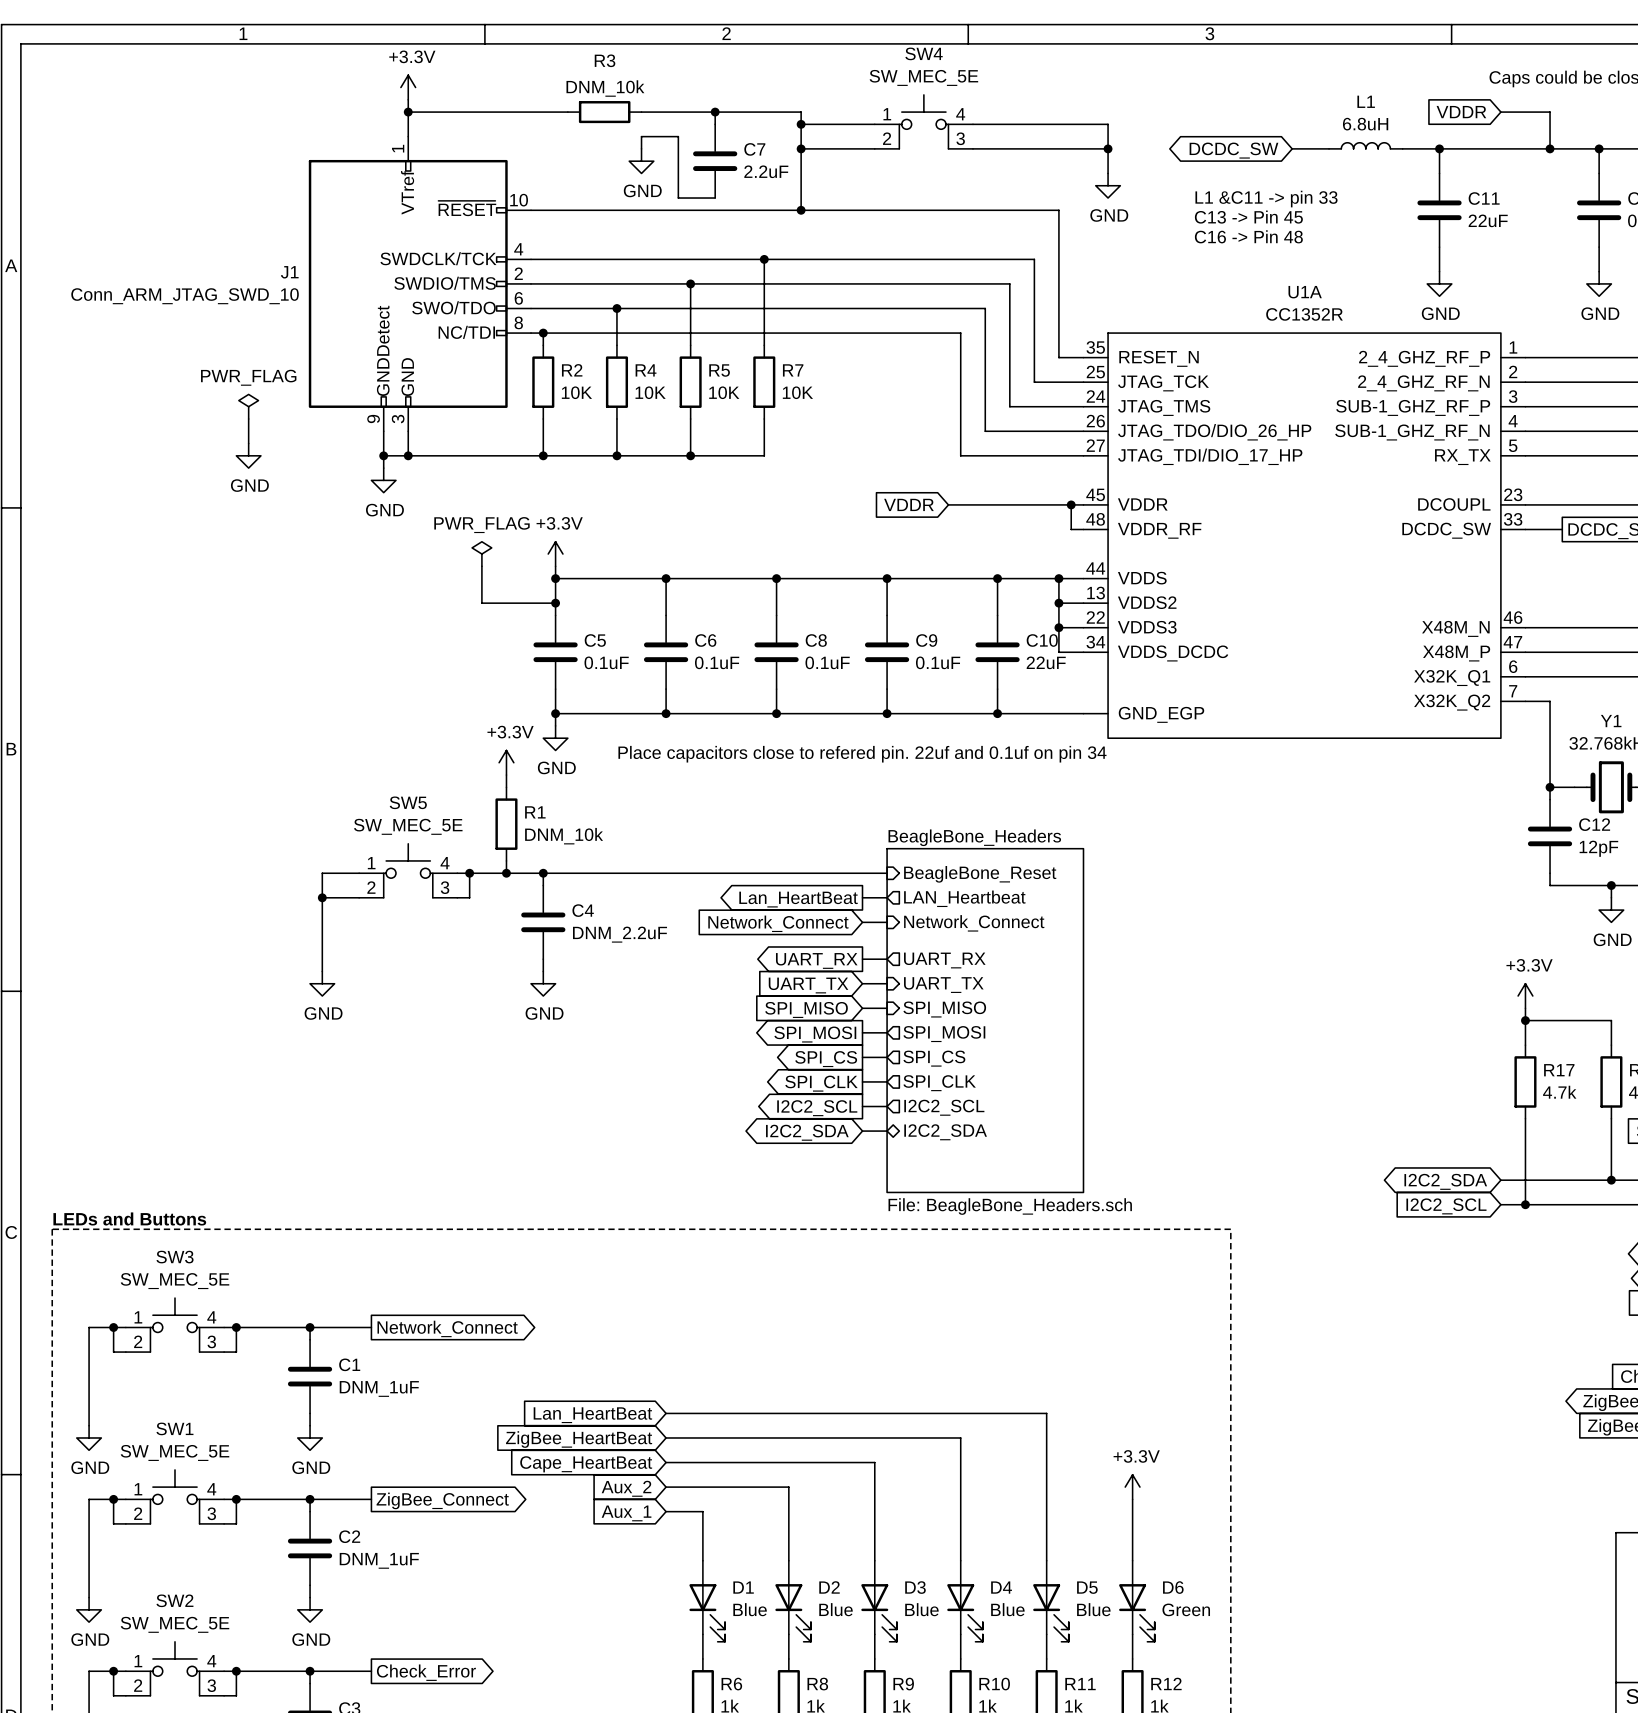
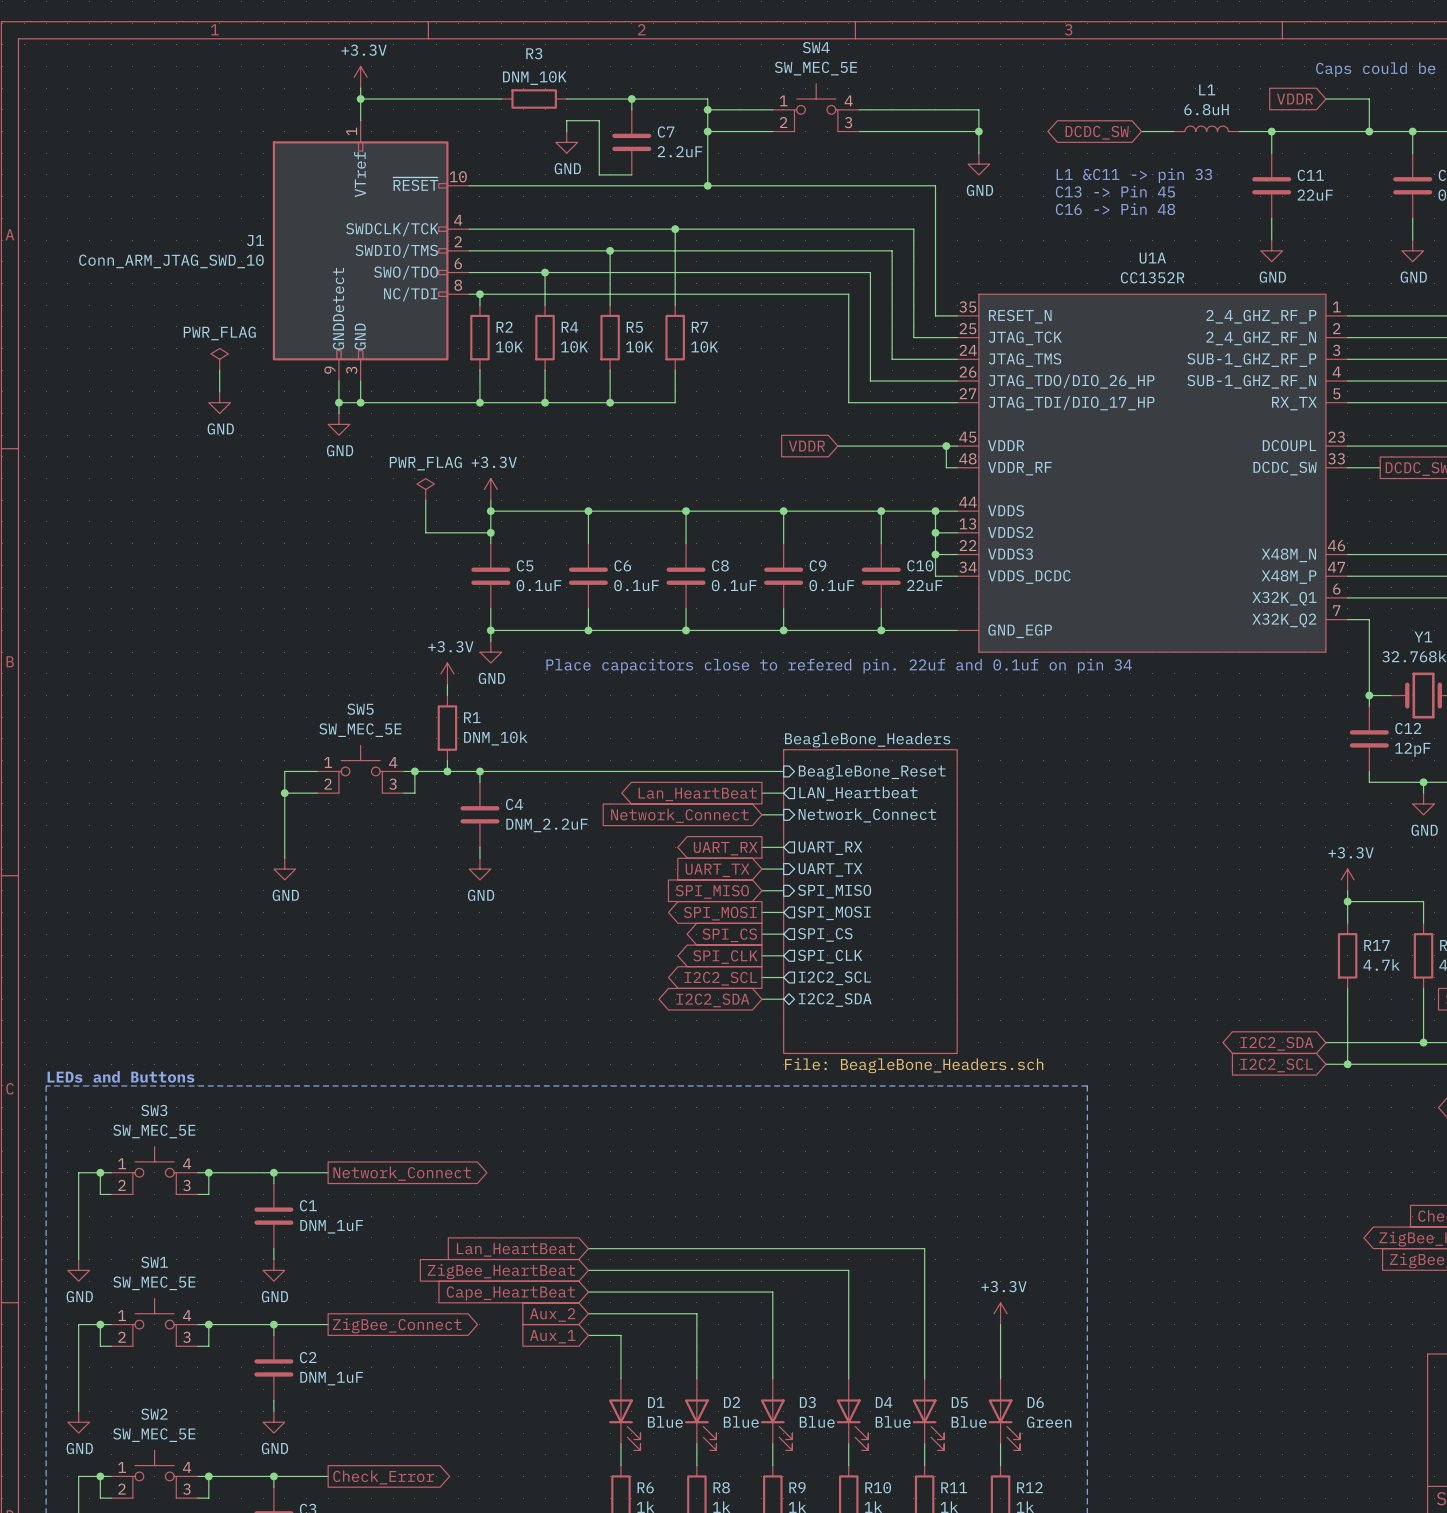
R3 value: DNM_10k (605, 88) -> DNM_10K (534, 78)

